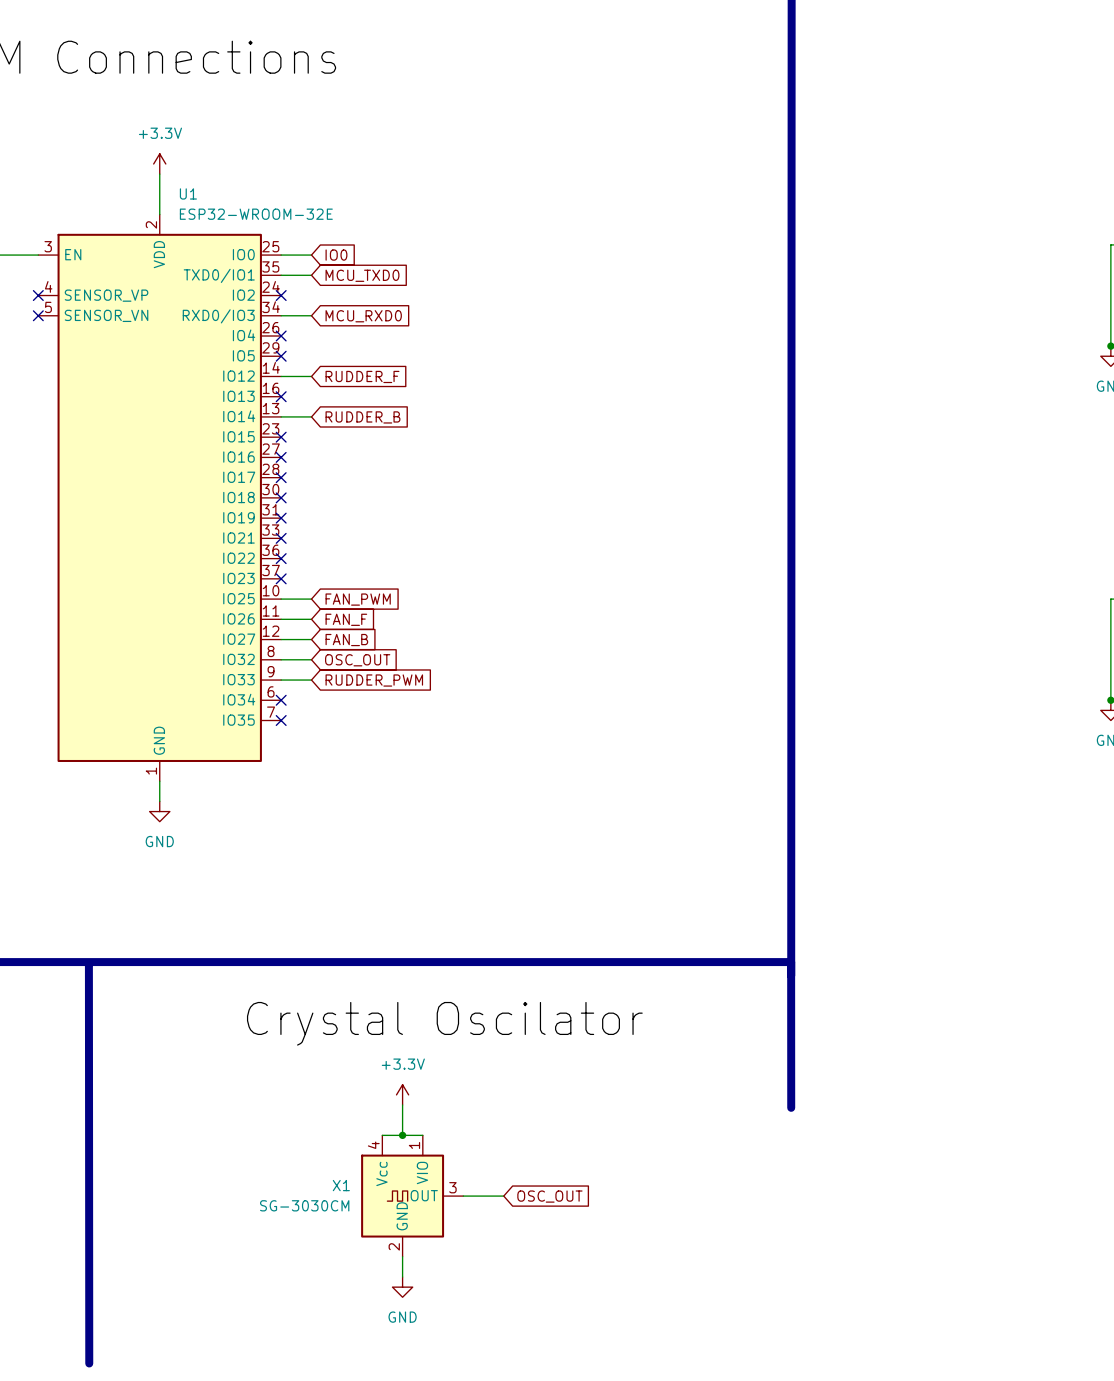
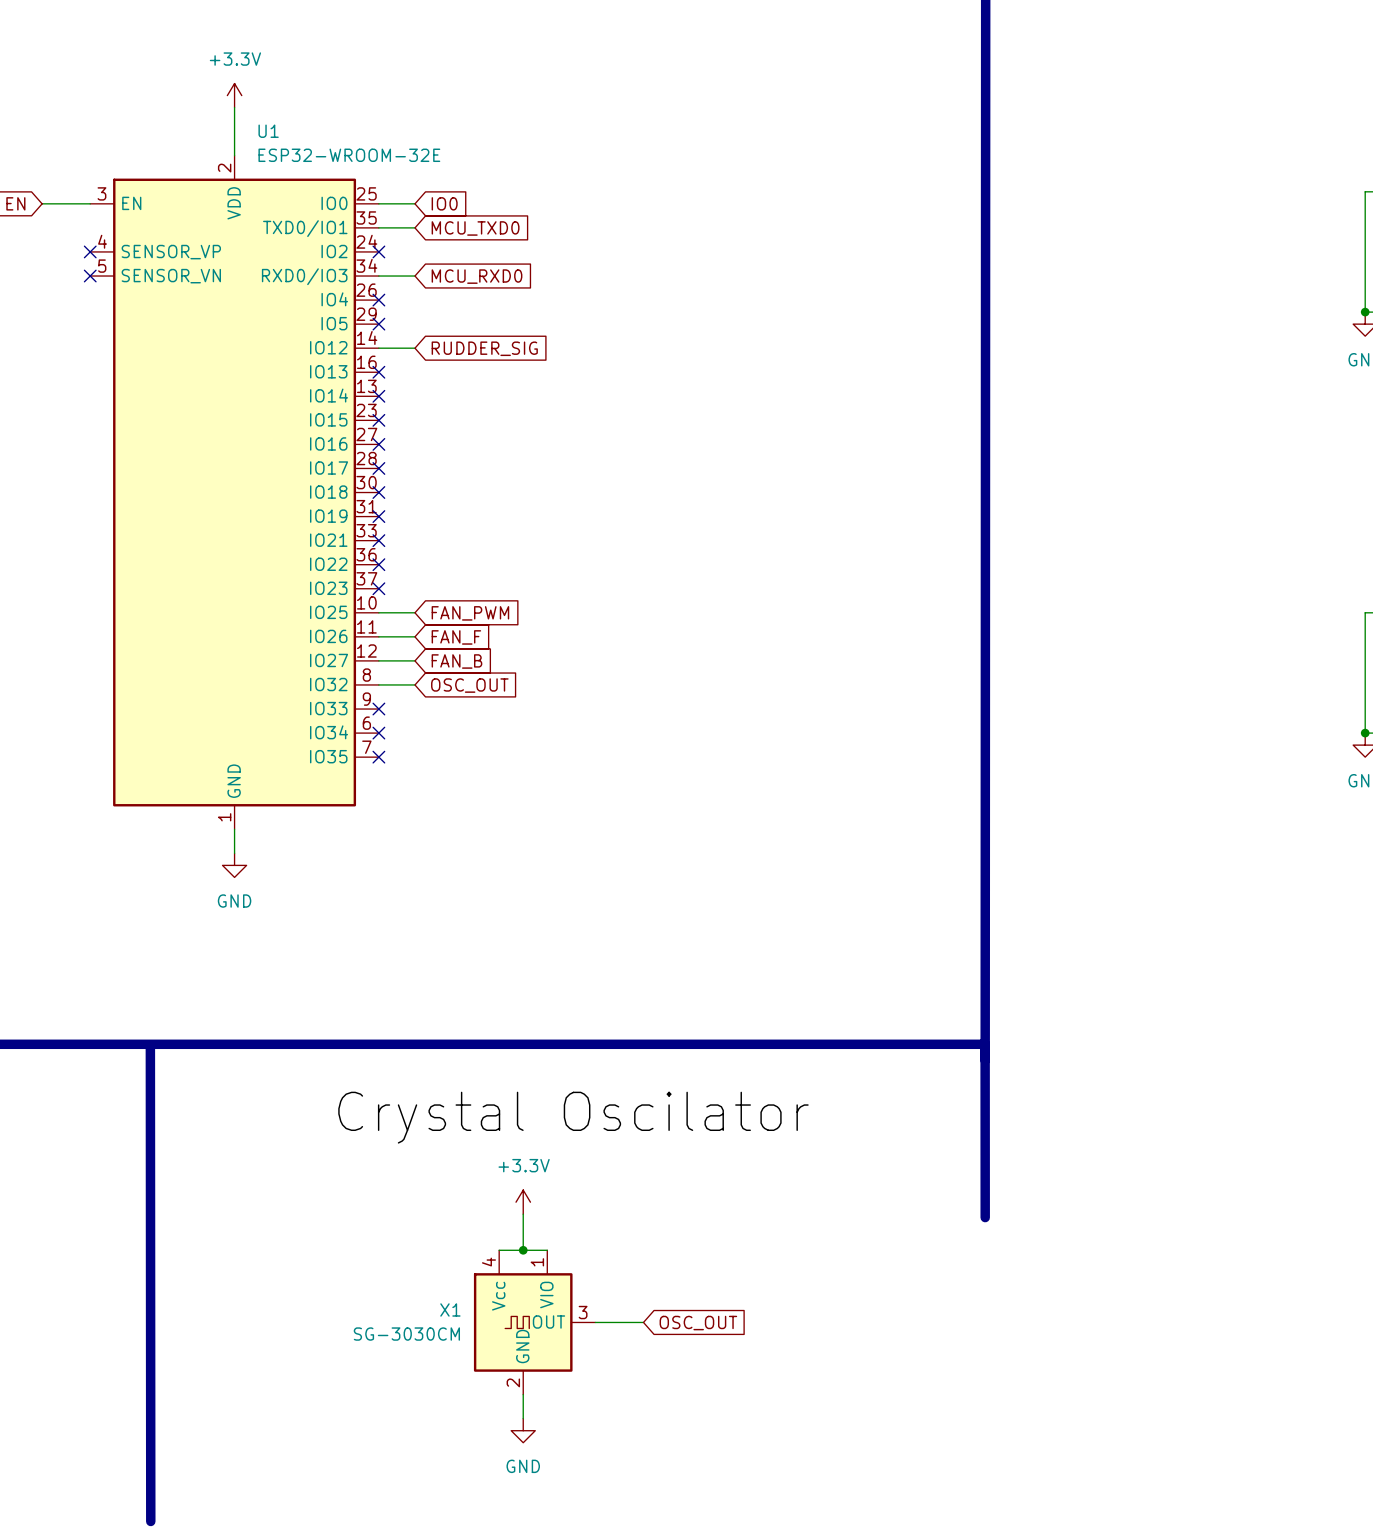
global label: RUDDER_F (362, 376) -> RUDDER_SIG (484, 348)
wire: (281, 416) (311, 416) -> none
no-connect mark: none -> (378, 396)
global label: RUDDER_B (362, 417) -> none
wire: (281, 680) (311, 680) -> none
no-connect mark: none -> (378, 709)
global label: RUDDER_PWM (374, 680) -> none

